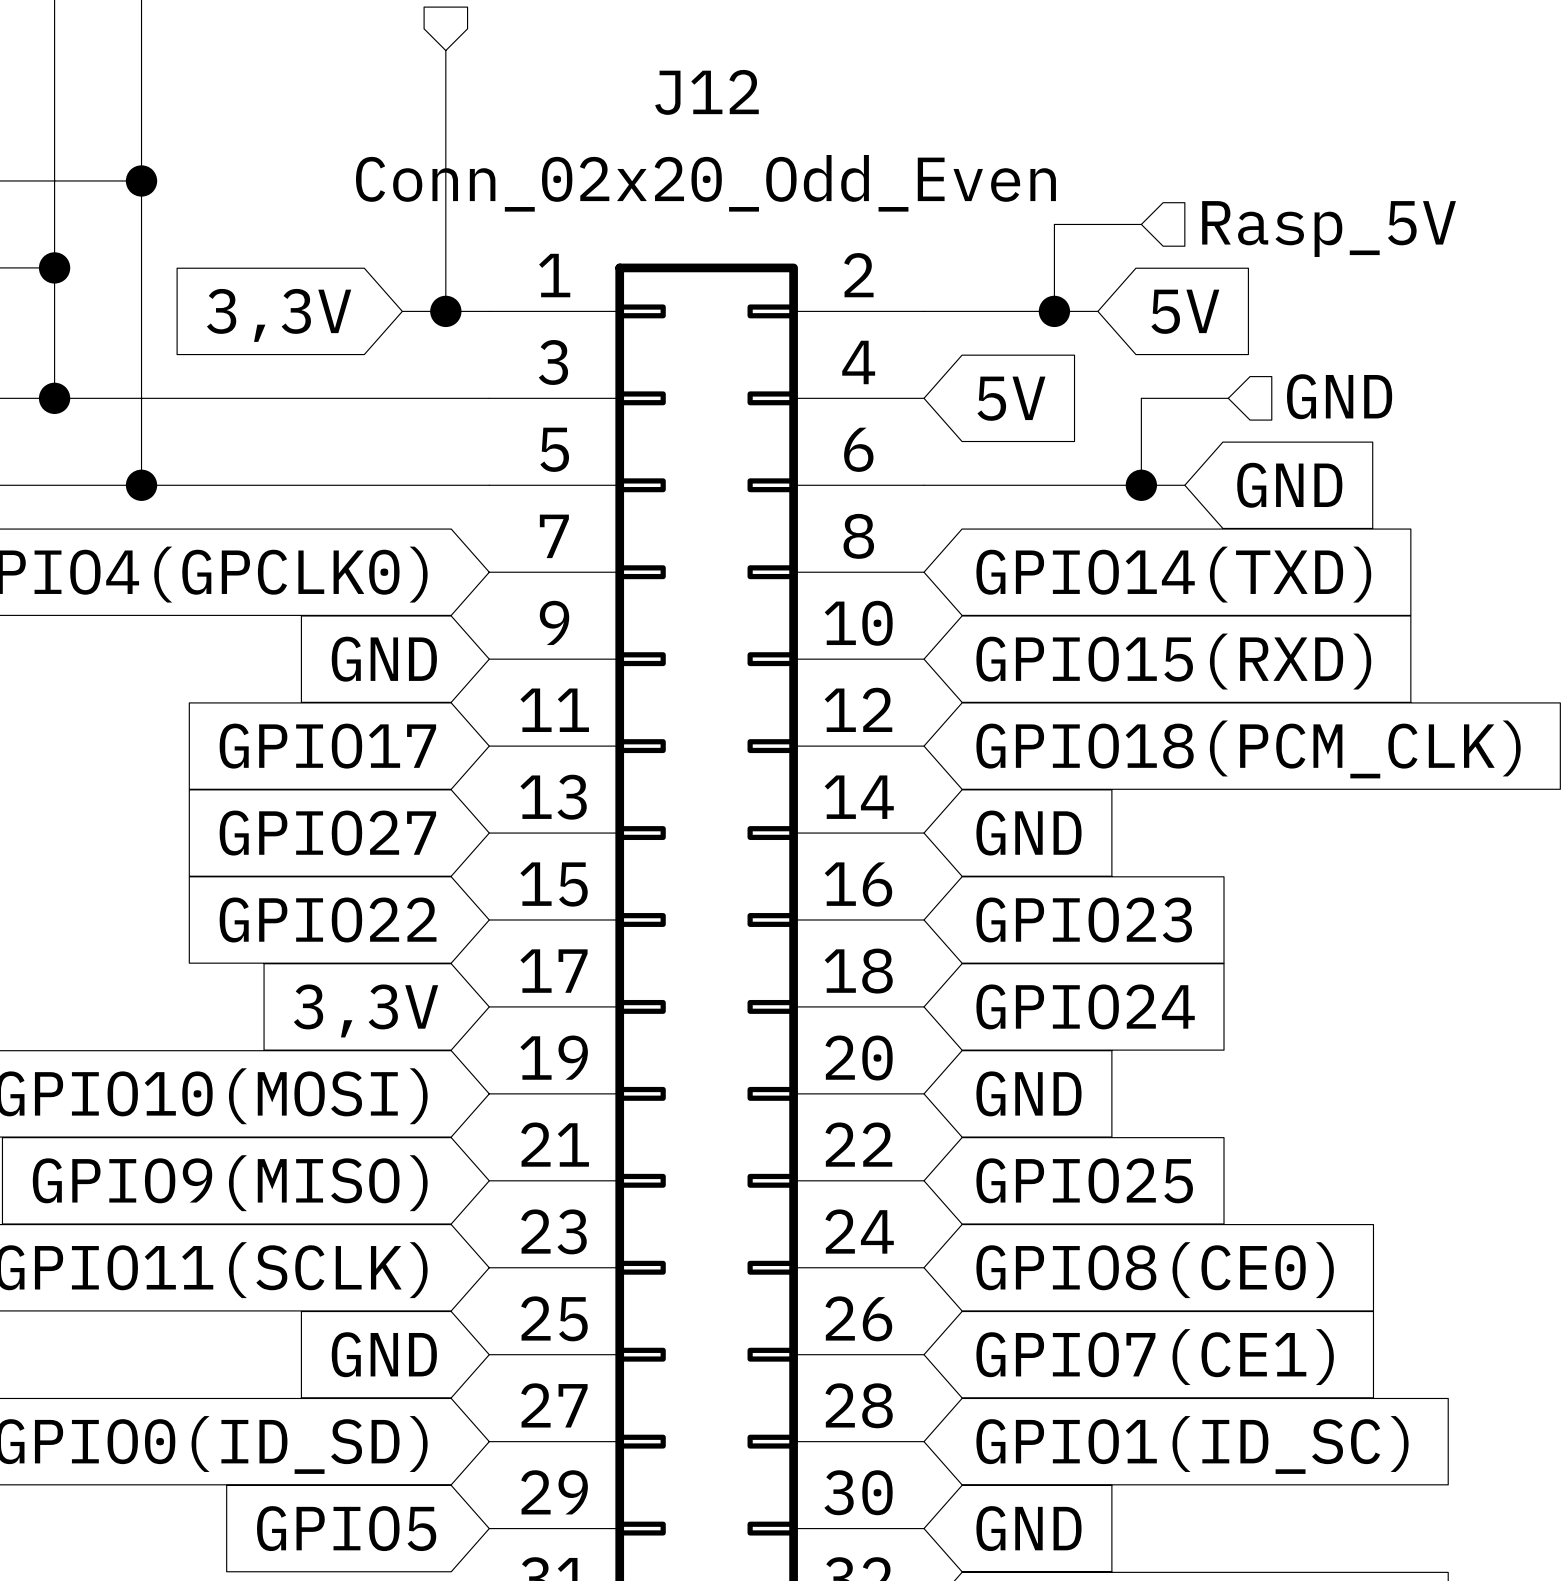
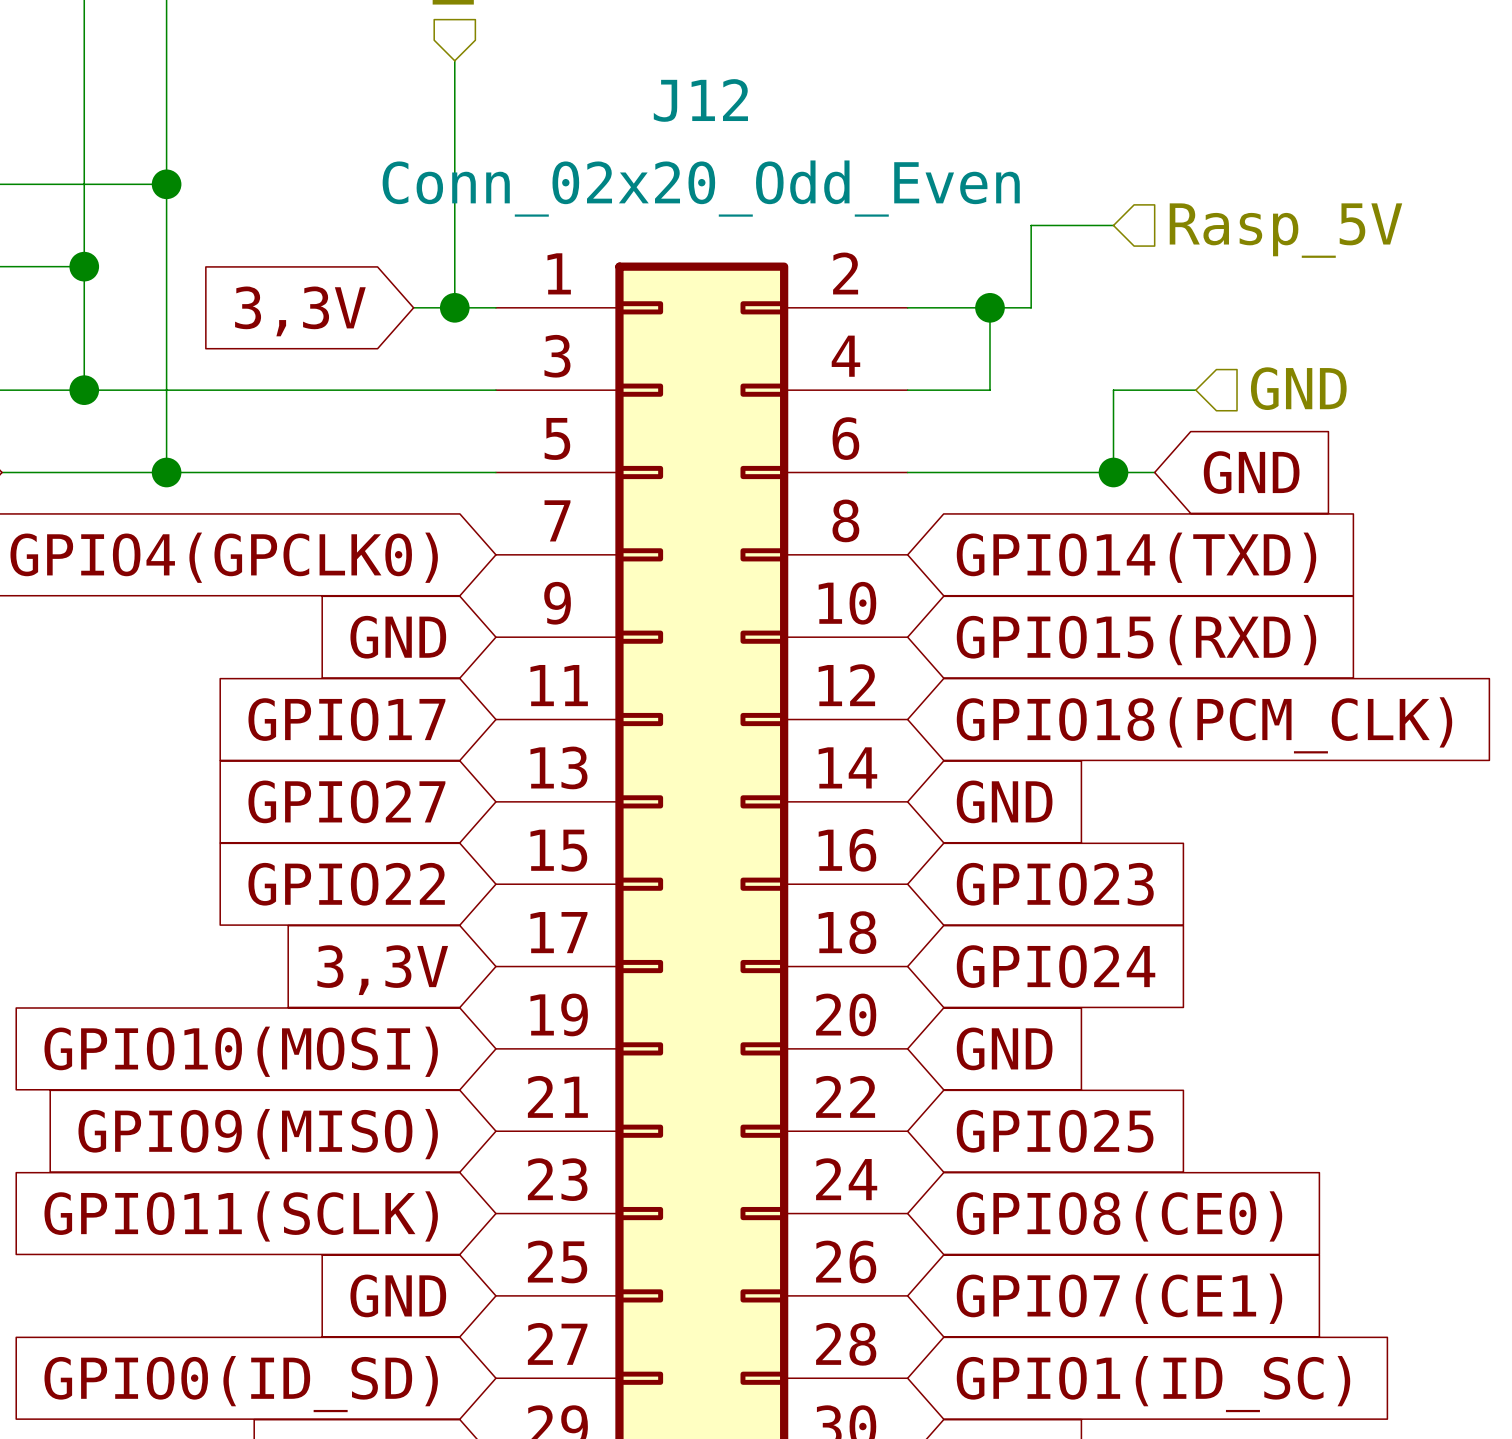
wire: none -> (989, 307) (989, 390) (907, 390)
wire: (1054, 311) (1097, 311) -> none
junction position: (1054, 311) -> (989, 307)
global label: 5V (1185, 311) -> none
global label: 5V (1011, 398) -> none

